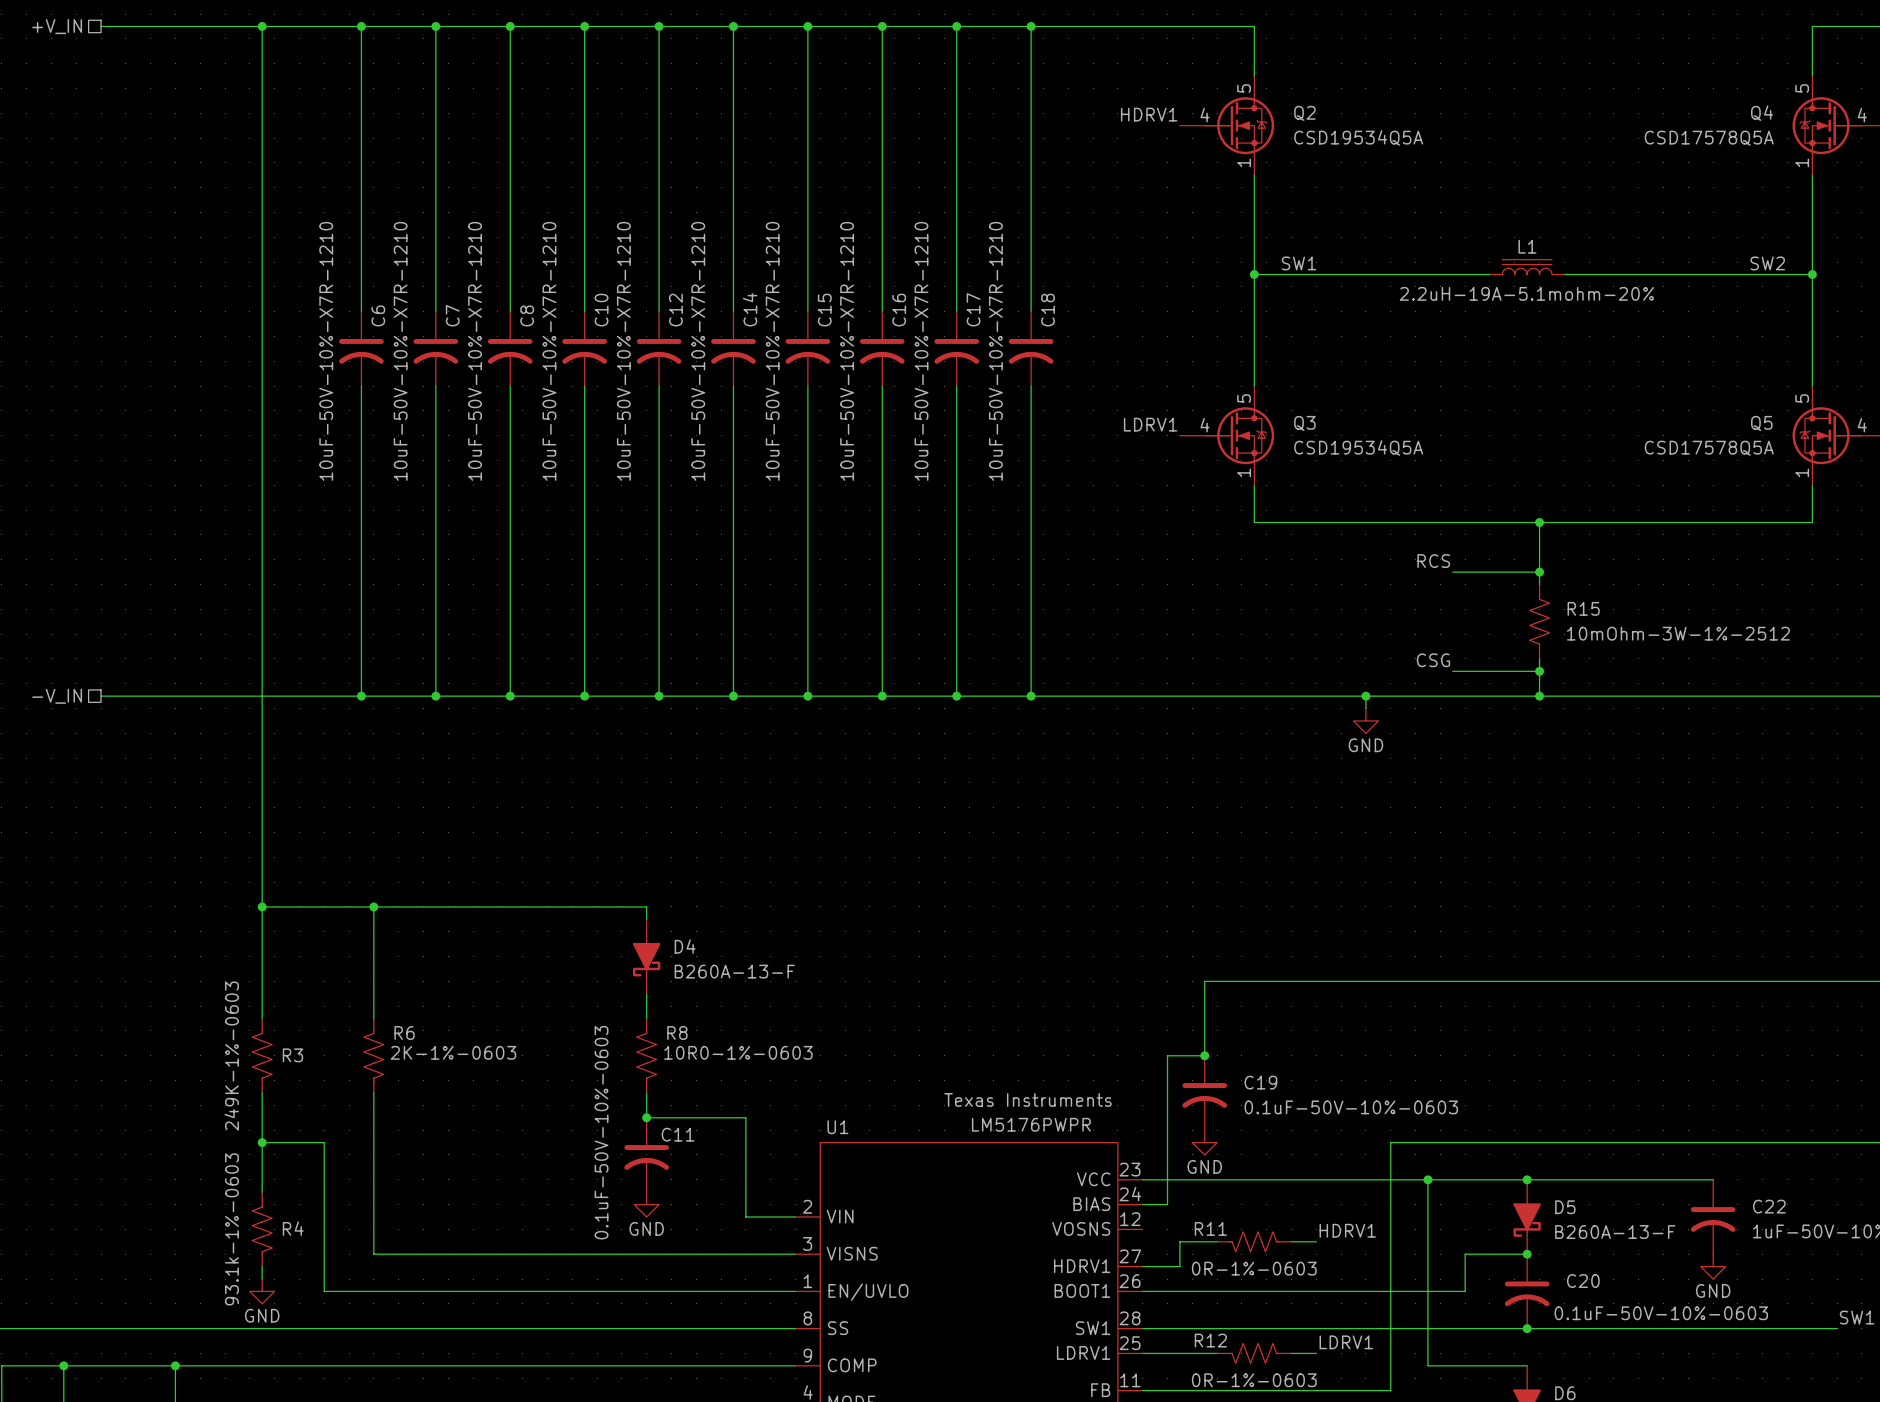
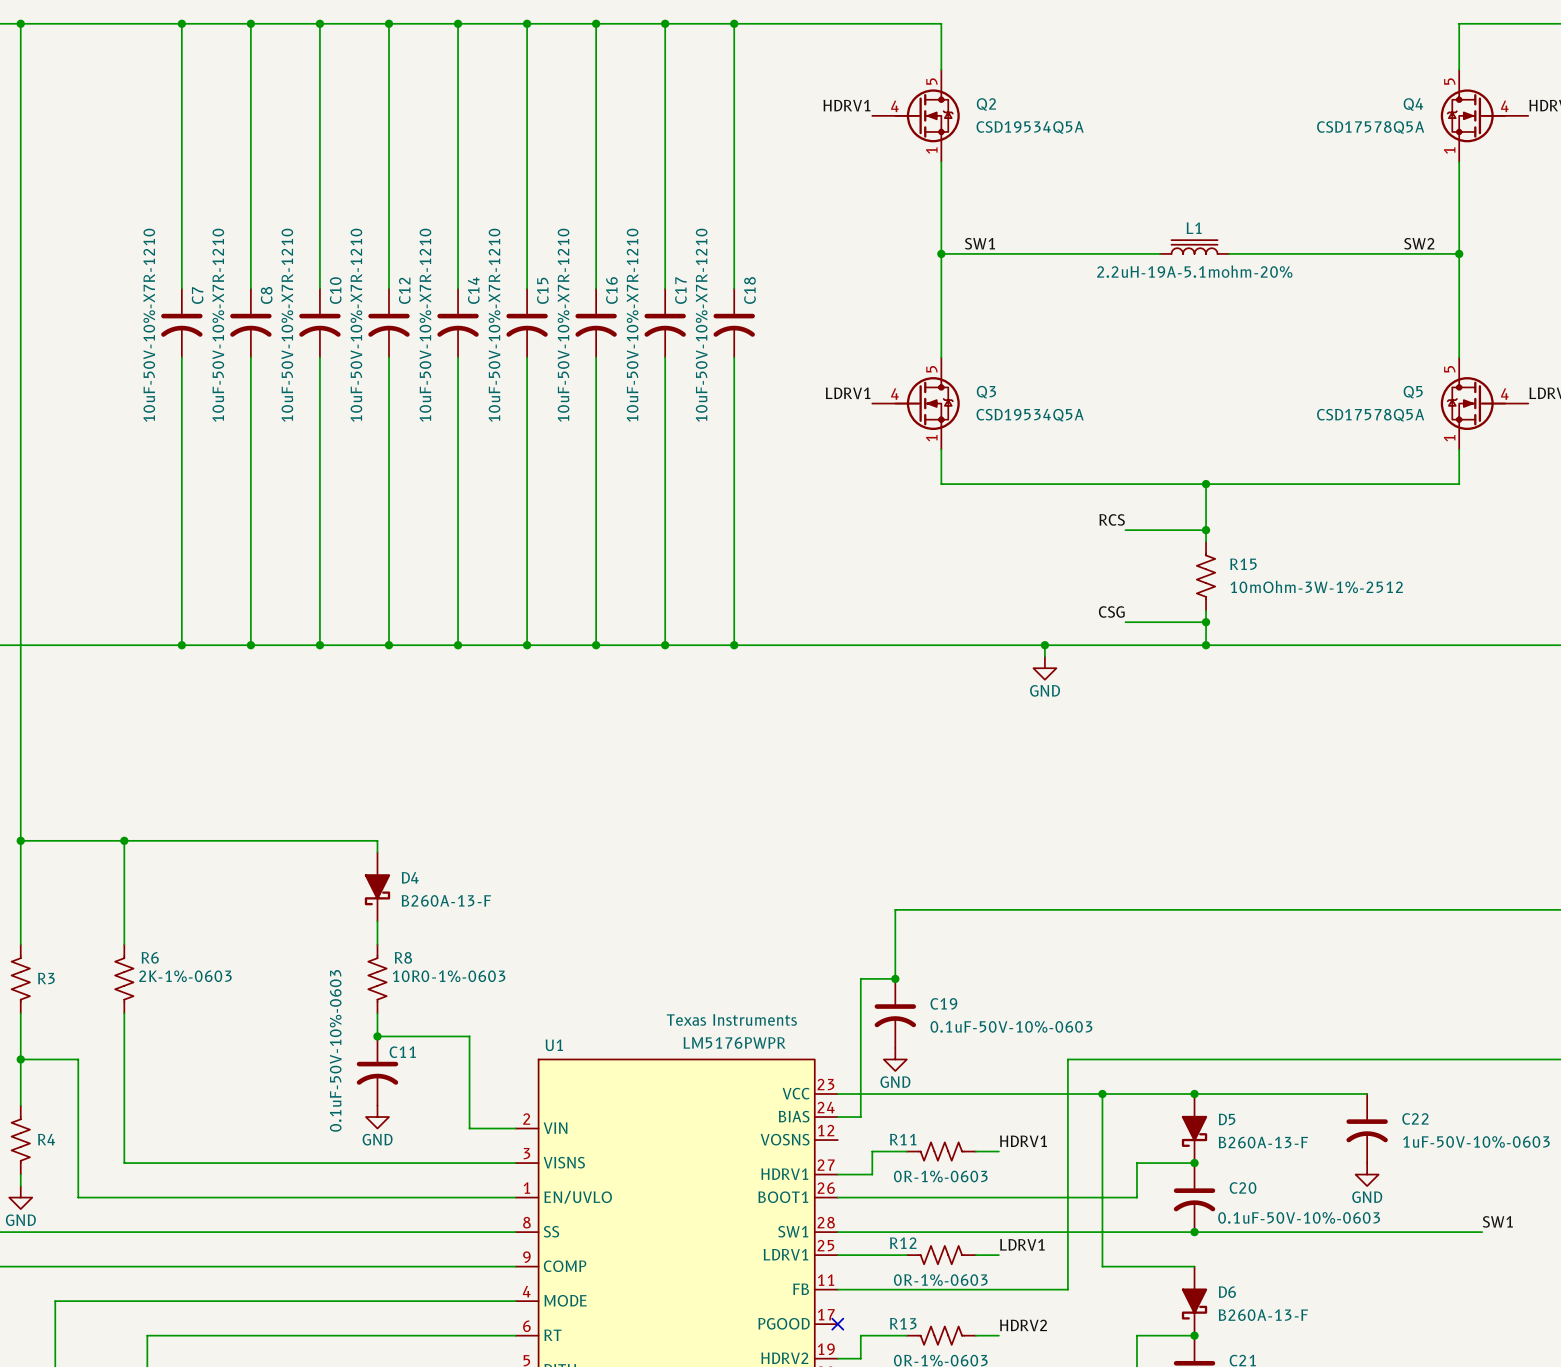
wire: (361, 26) (361, 311) -> none
junction: (361, 26) -> none
C6: 10uF-50V-10%-X7R-1210 (361, 348) -> none
wire: (361, 386) (361, 696) -> none
junction: (361, 696) -> none

